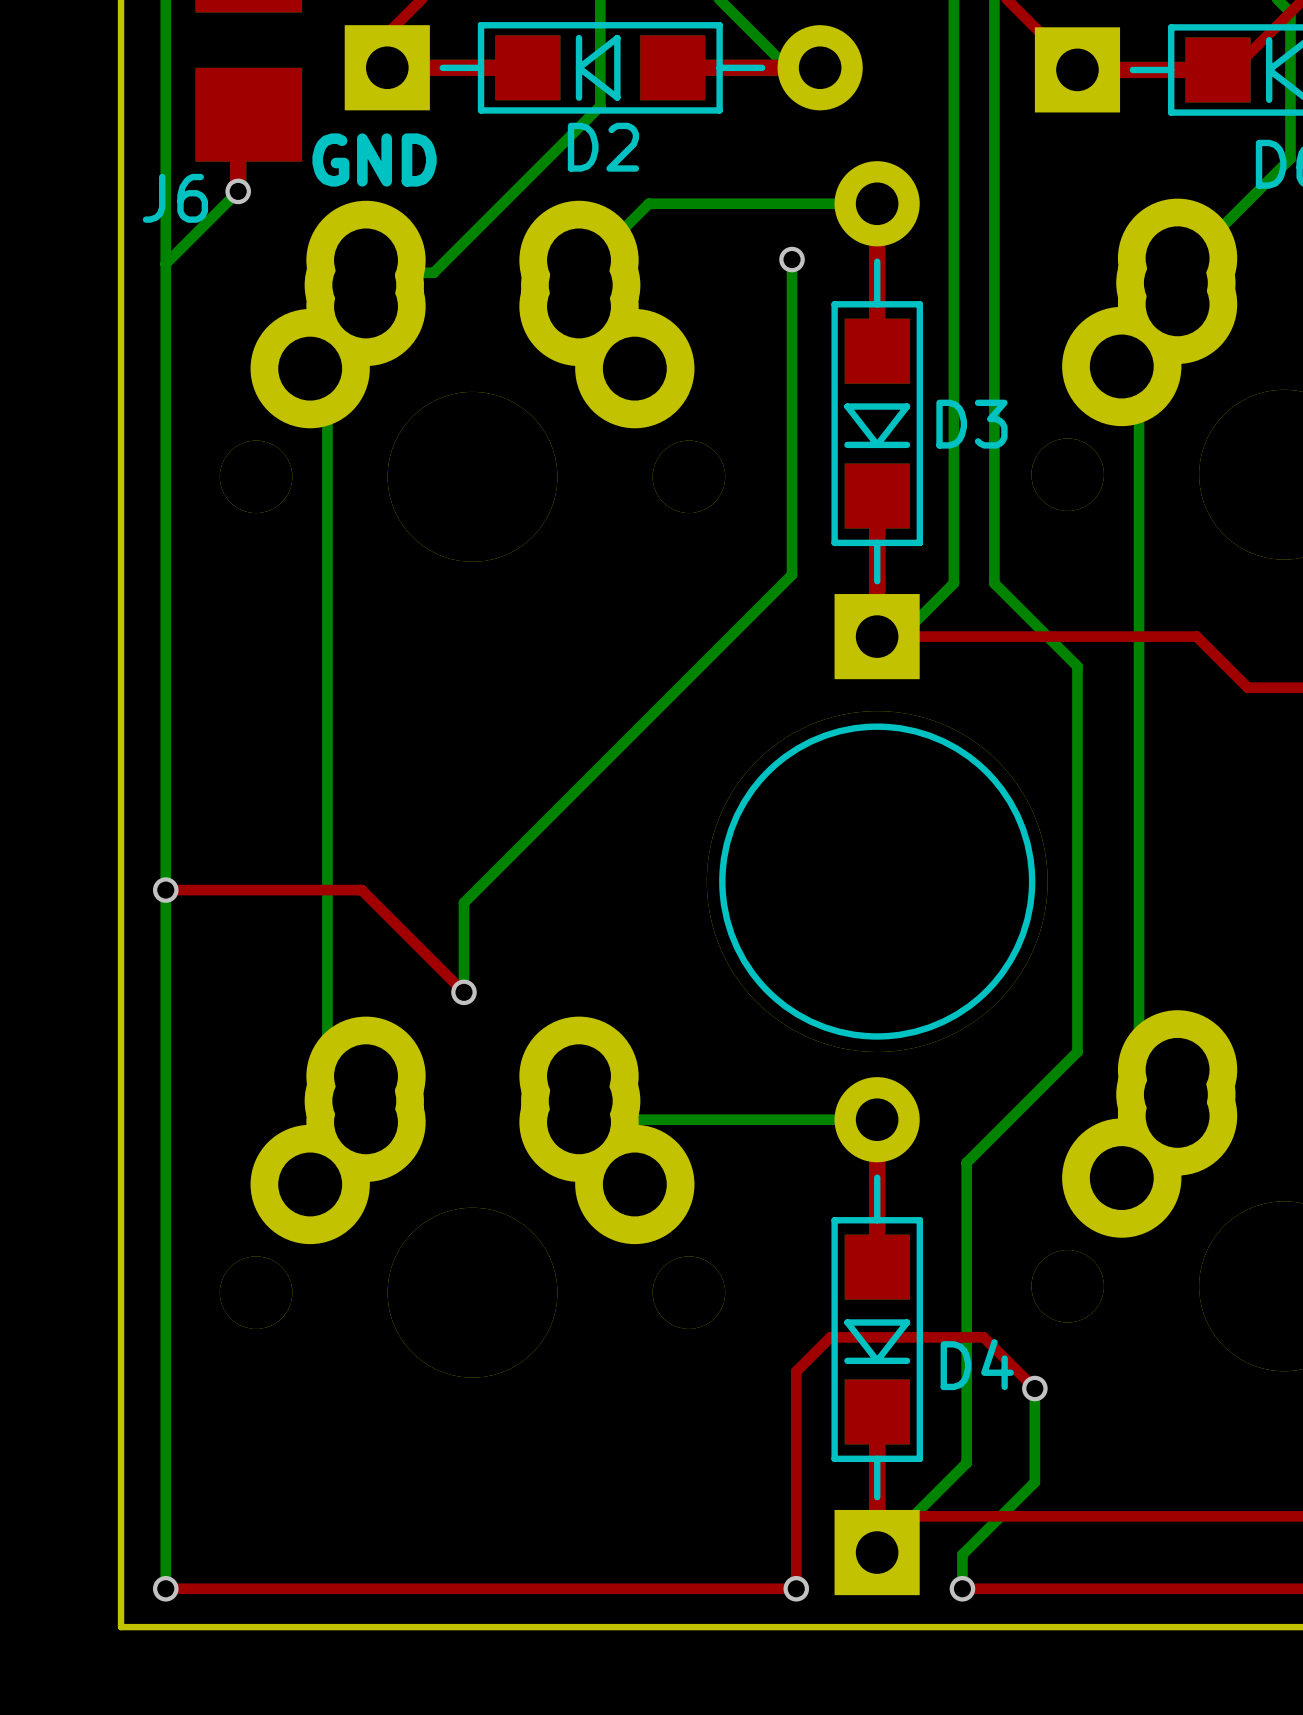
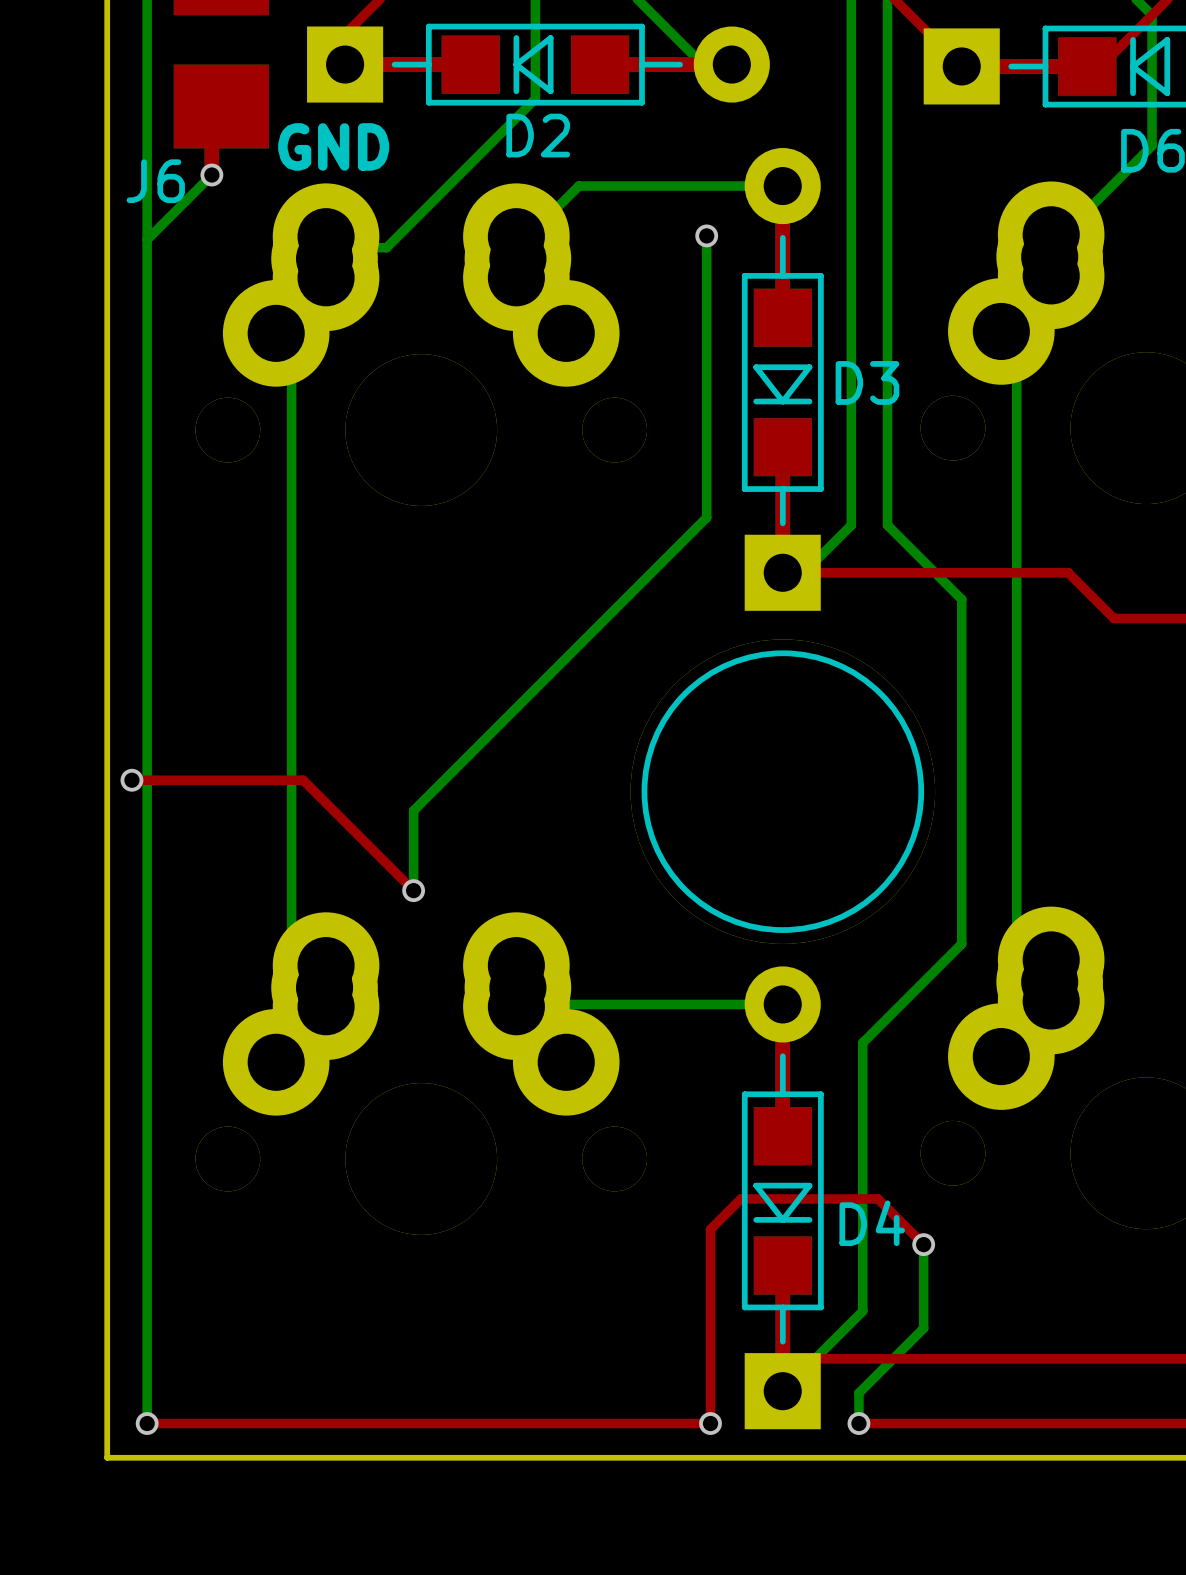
top track: (165, 890) (361, 890) -> (131, 780) (303, 780) (322, 799)
via position: (165, 890) -> (131, 780)

